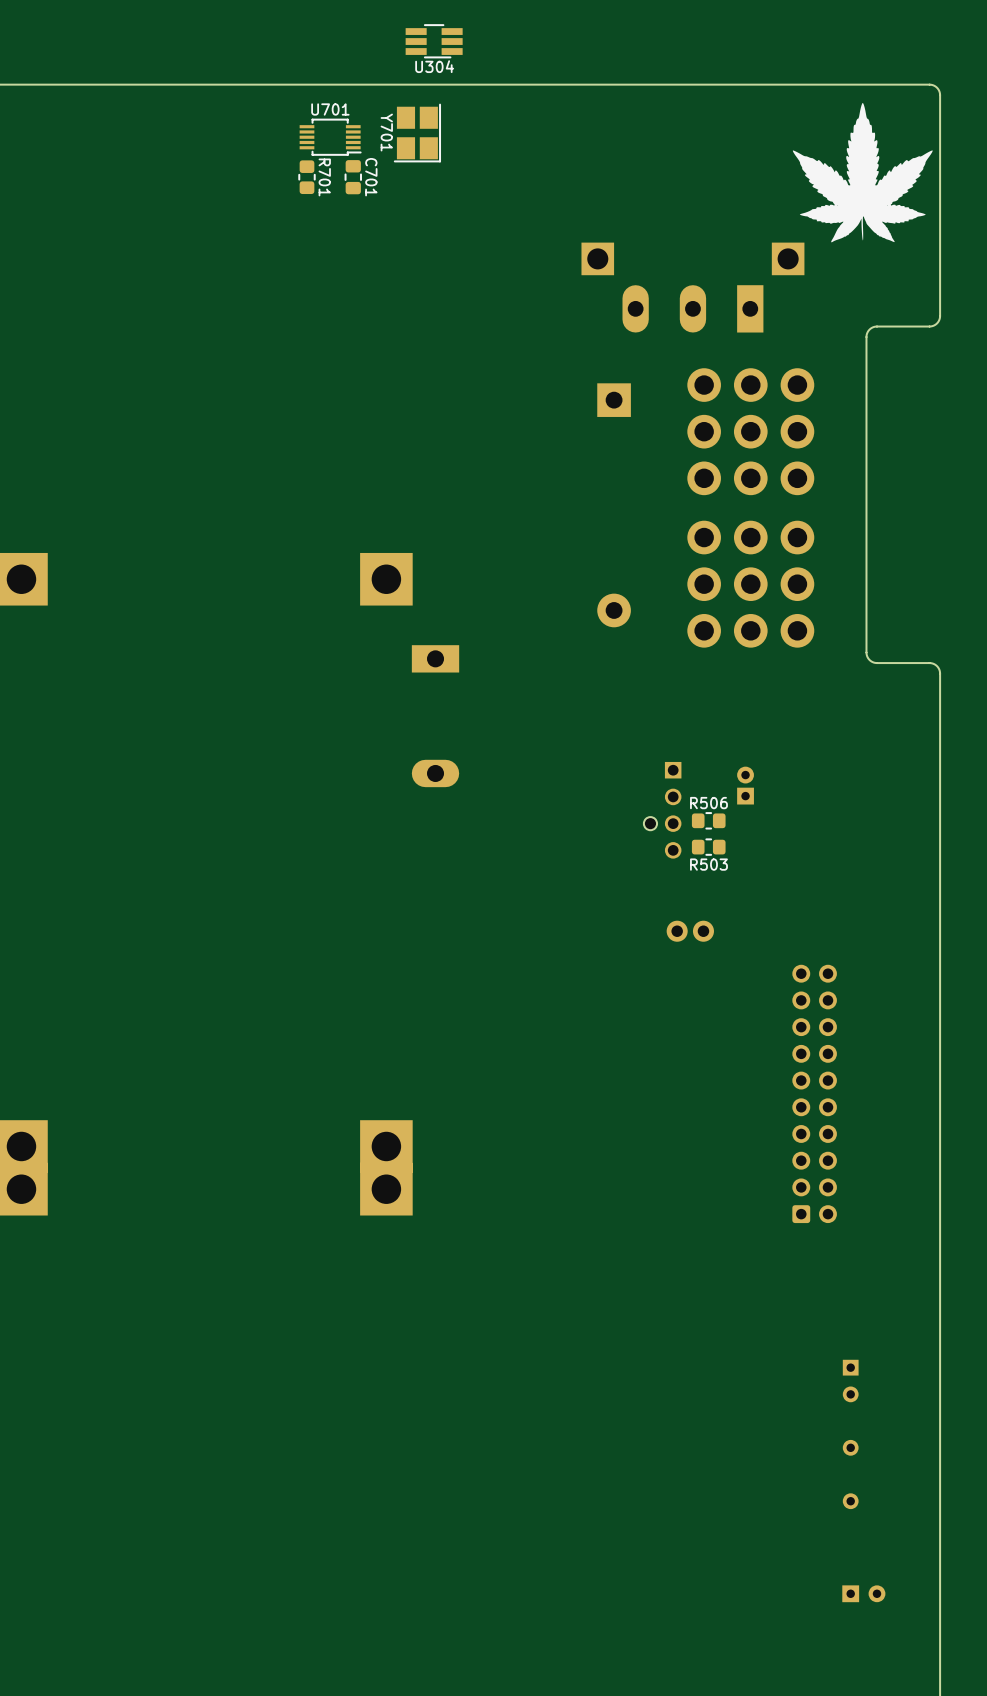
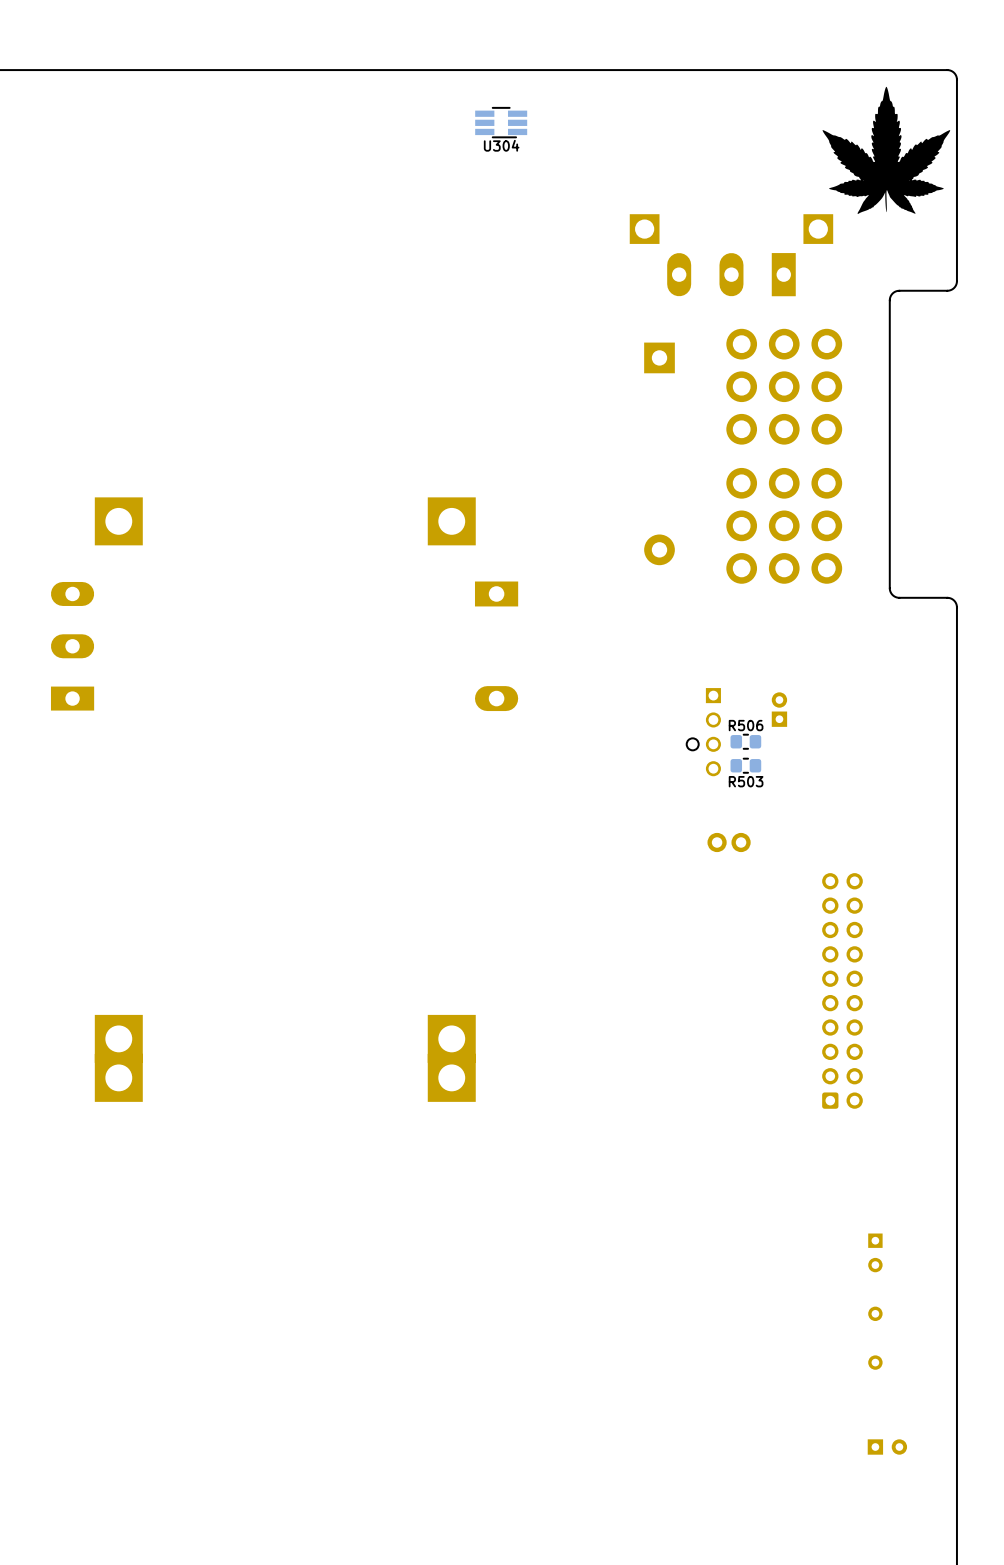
U304 position: (434, 41) -> (501, 122)
Y701: (417, 133) -> none
U701: (330, 137) -> none
R701: (306, 177) -> none
C701: (353, 177) -> none

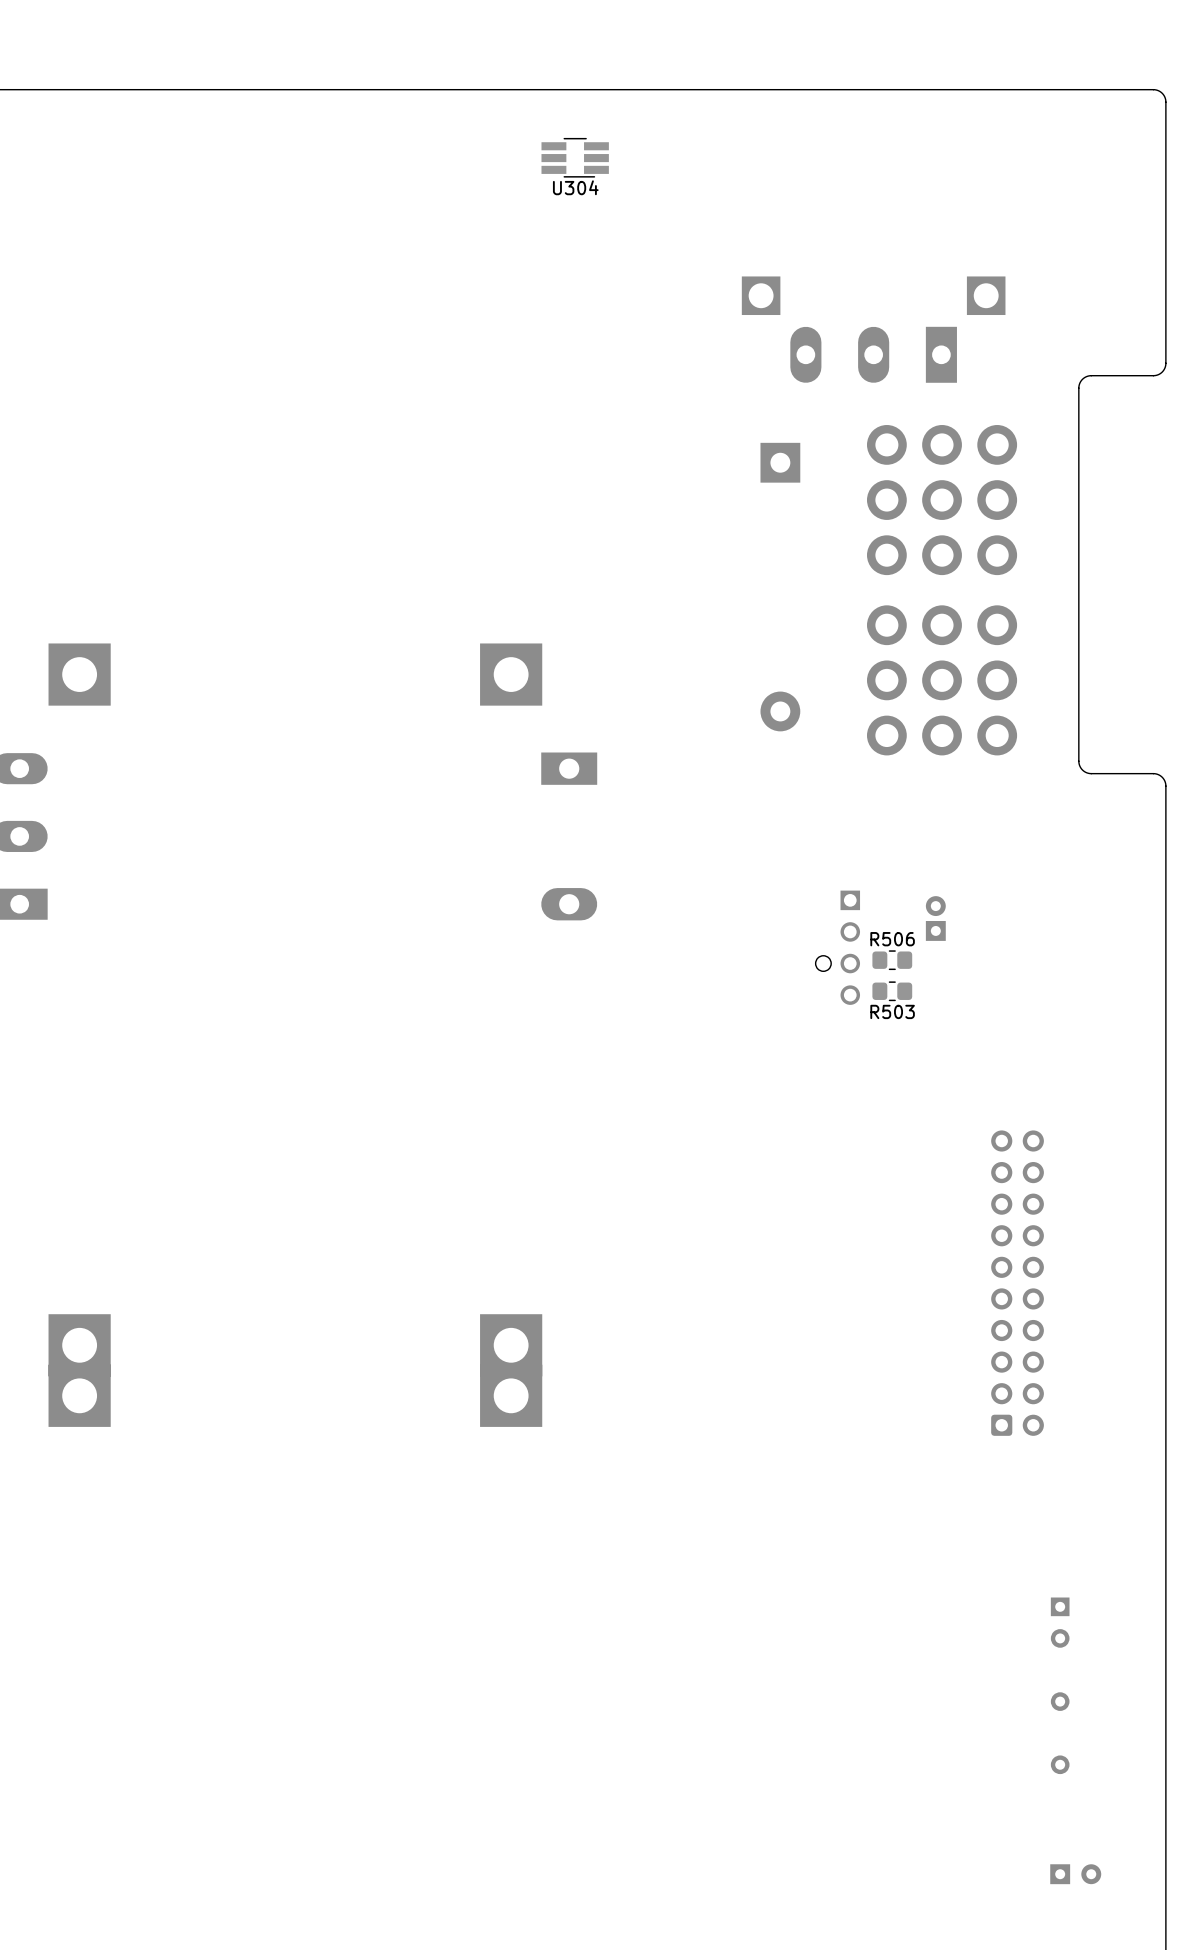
drawing: [822, 86, 951, 214] -> none
part: (717, 842) -> none
part: (741, 842) -> none

